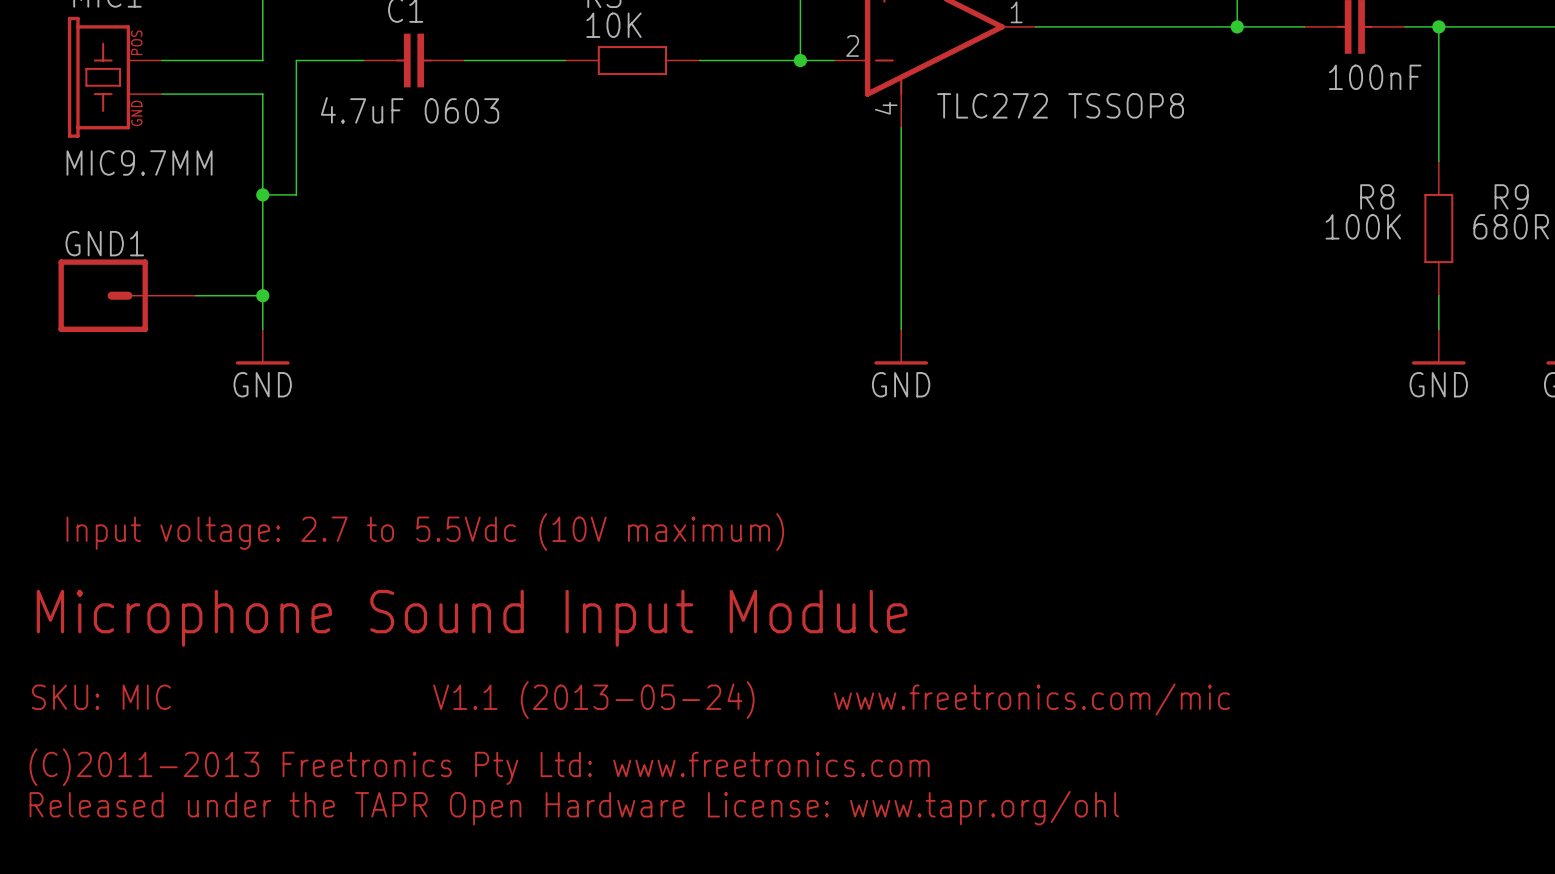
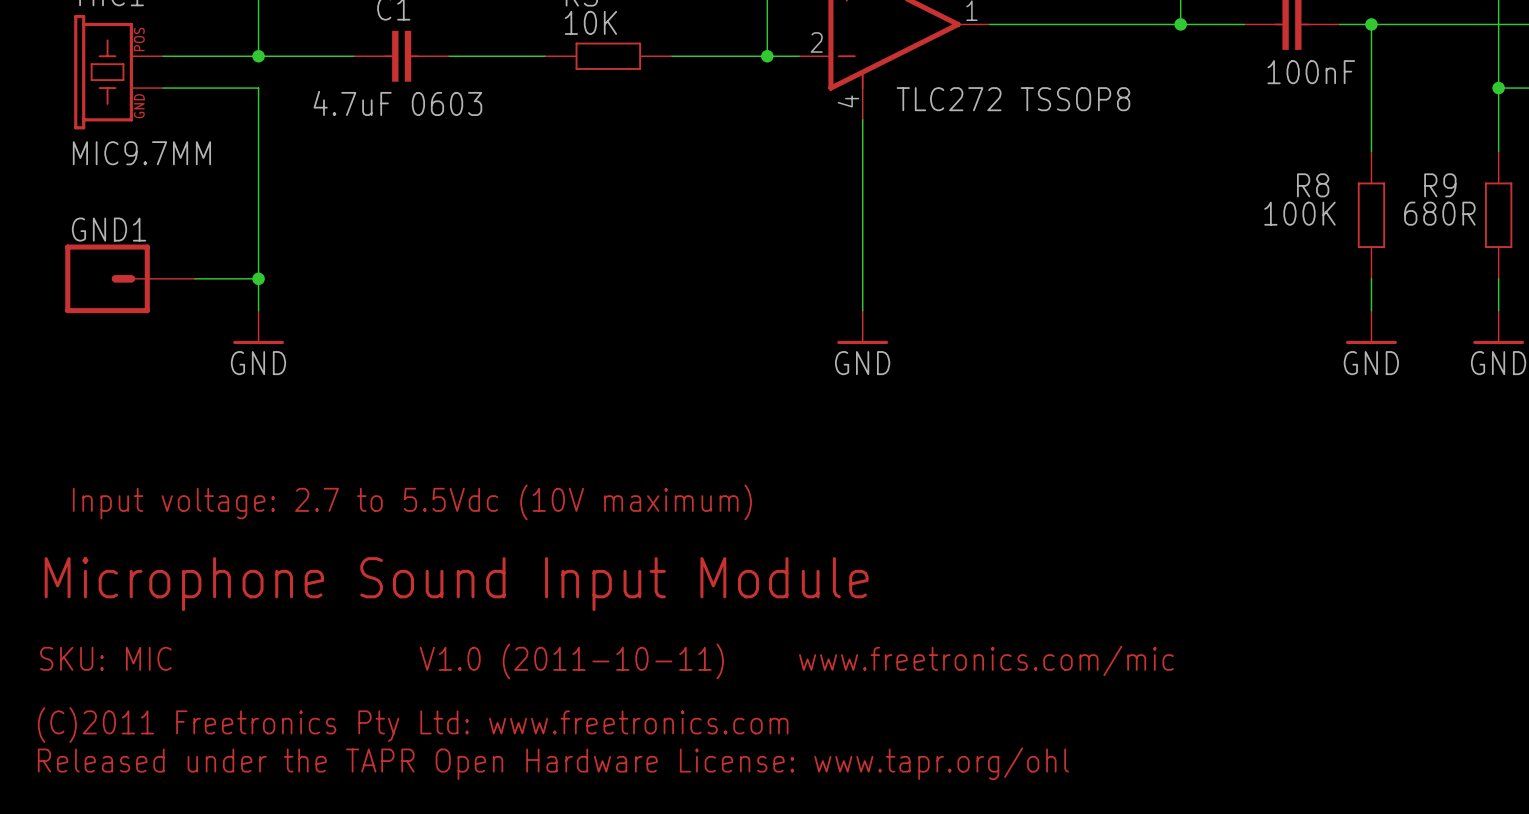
junction: none -> (258, 56)
wire: (296, 60) (296, 194) (262, 194) -> (290, 56) (258, 56)
junction: (262, 194) -> none
text: V1.1 (2013-05-24) (593, 700) -> V1.0 (2011-10-11) (571, 661)
text: (C)2011-2013 Freetronics Pty Ltd: www.freetronics.com (479, 767) -> (C)2011 Freetronics Pty Ltd: www.freetronics.com (413, 725)

